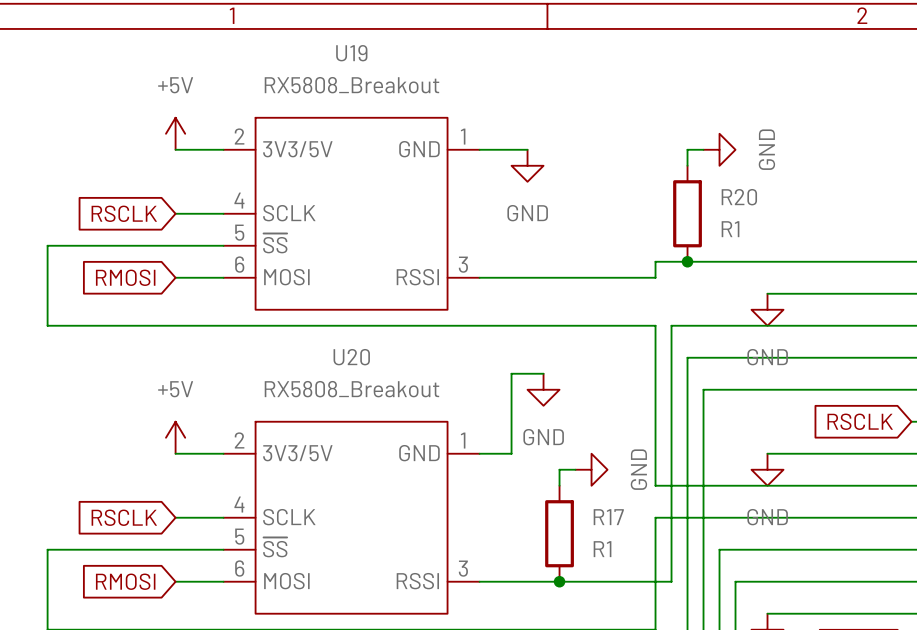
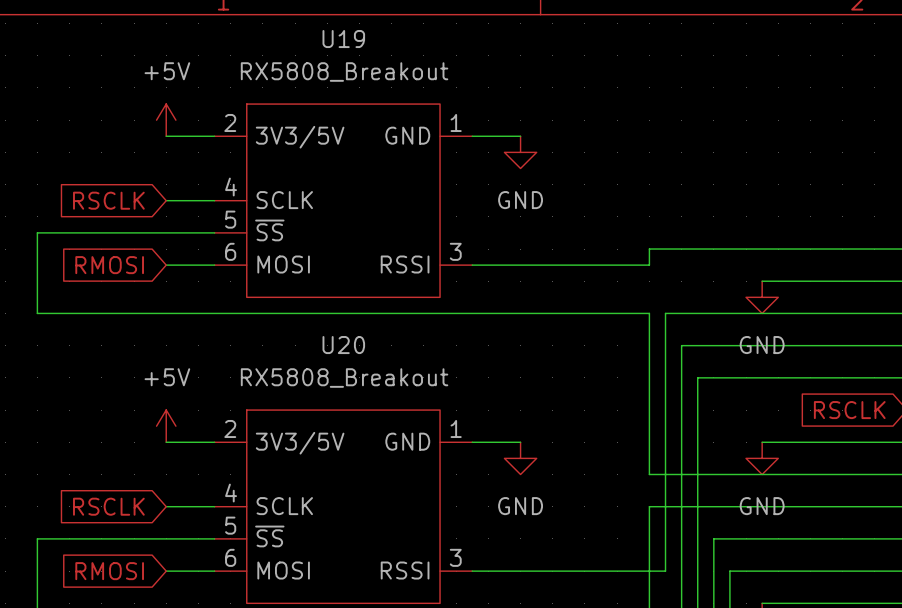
wire: (703, 149) (687, 149) (687, 165) -> none
power symbol: GND (719, 149) -> none
R20: R1 (687, 213) -> none
junction: (687, 261) -> none
wire: (543, 373) (511, 373) (511, 453) -> (520, 442) (504, 442)
power symbol: GND (543, 389) -> none
power symbol: none -> GND (520, 458)
wire: (575, 469) (559, 469) (559, 485) -> none
power symbol: GND (591, 469) -> none
R17: R1 (559, 533) -> none
junction: (559, 581) -> none

